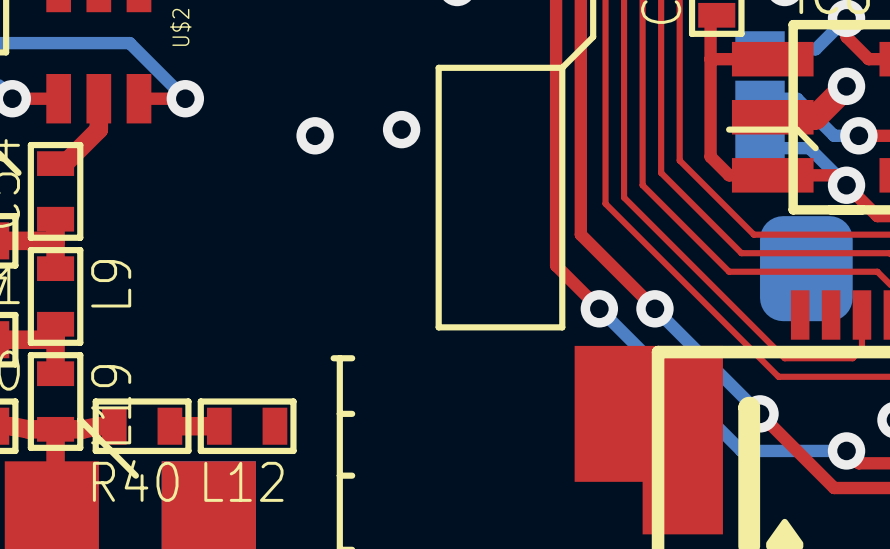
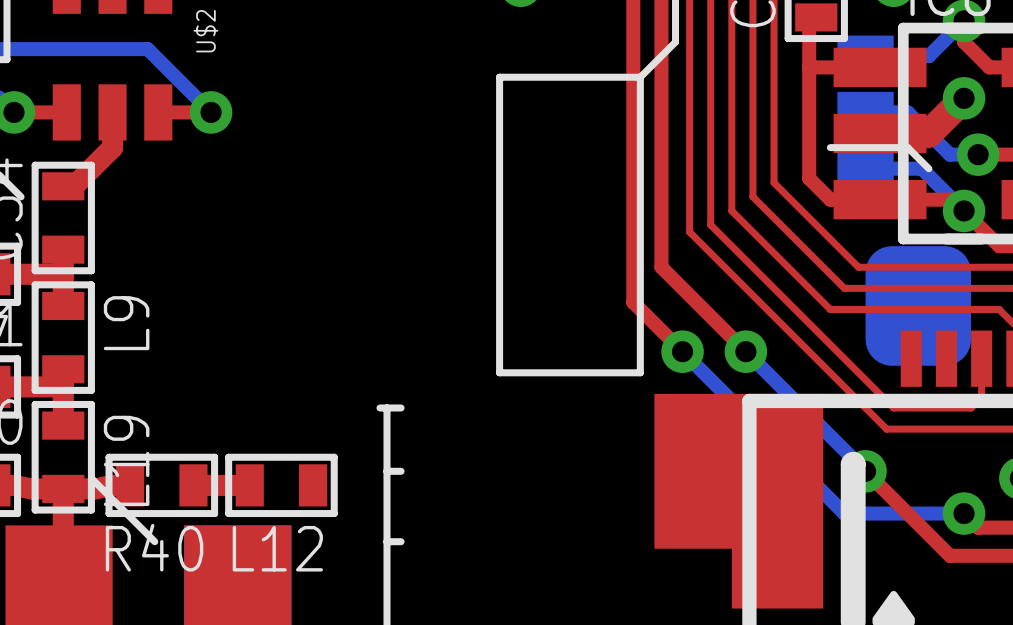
via: (401, 129) -> none
via: (315, 135) -> none

